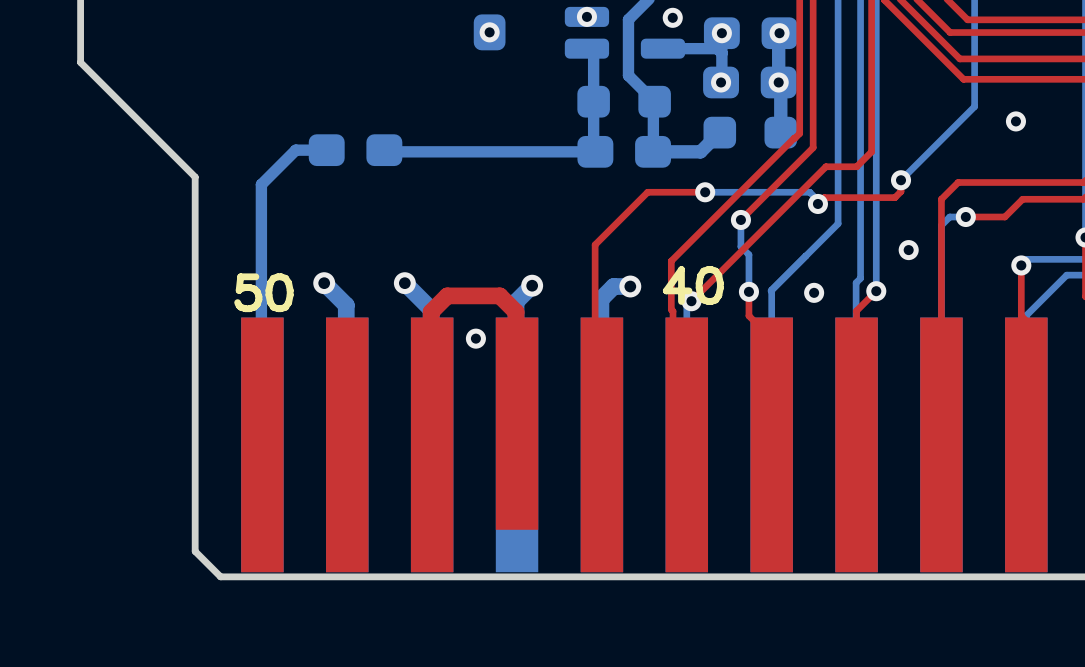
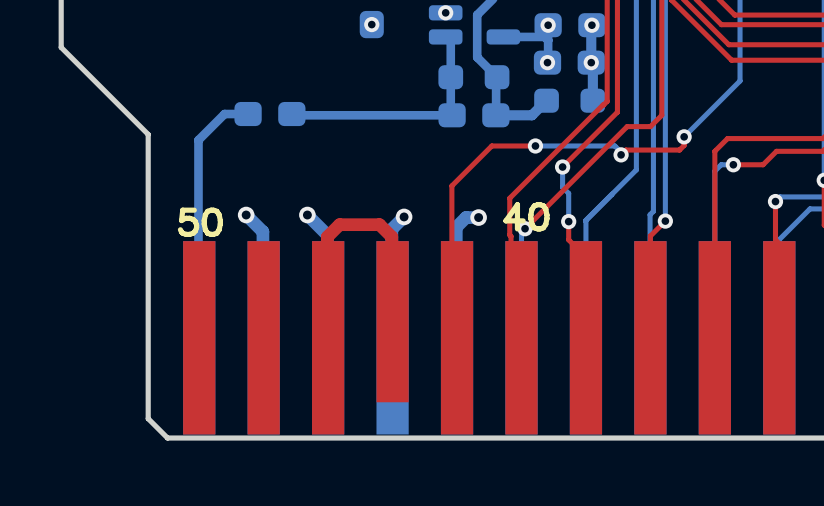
via: (672, 17) -> none
via: (1015, 121) -> none
via: (908, 250) -> none
via: (814, 292) -> none
via: (475, 338) -> none

